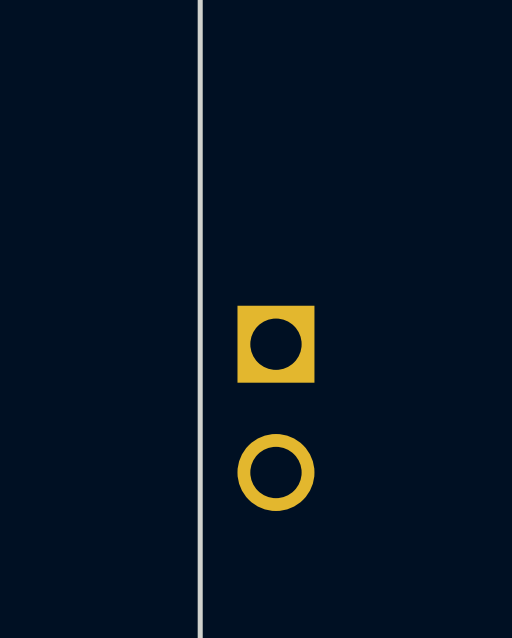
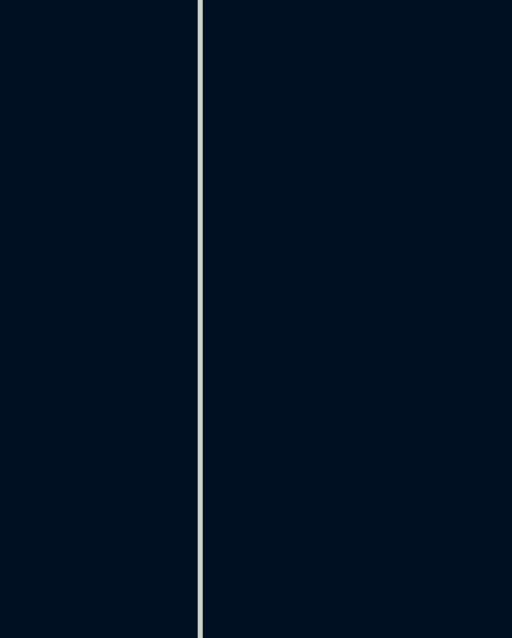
part: (275, 408) -> none

